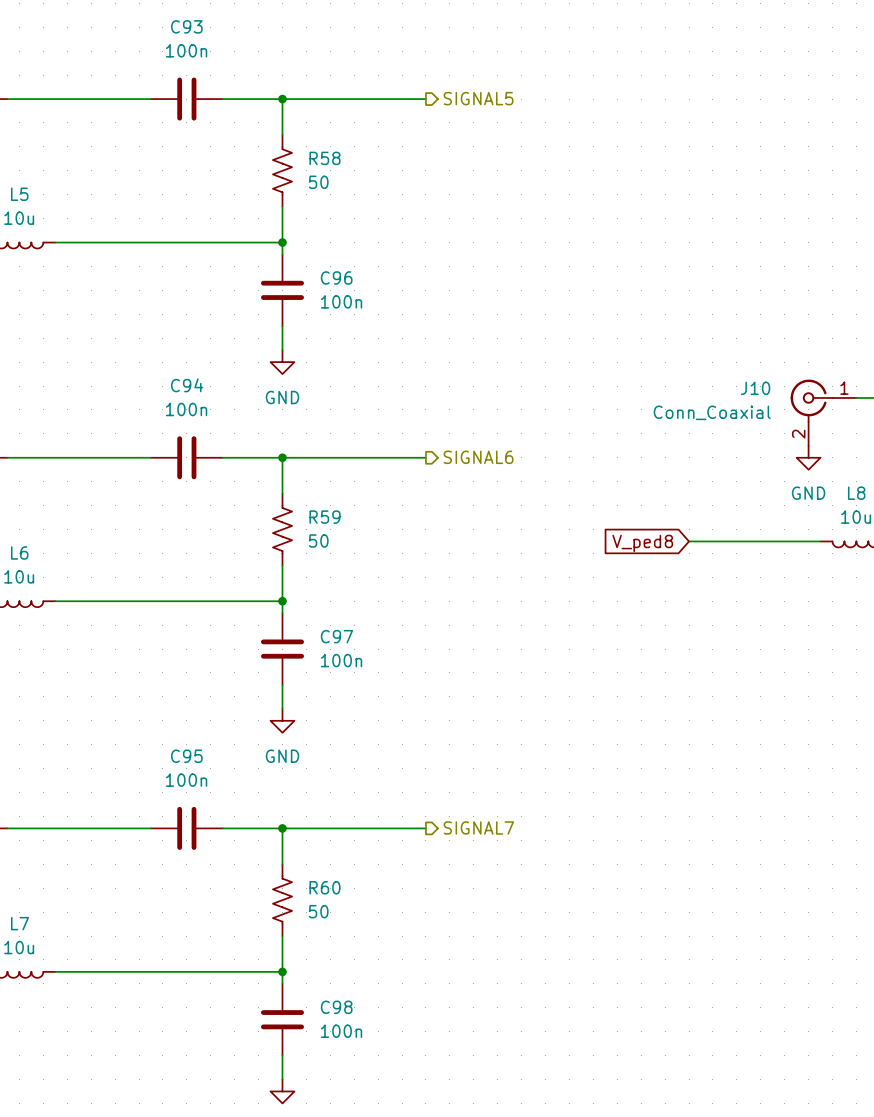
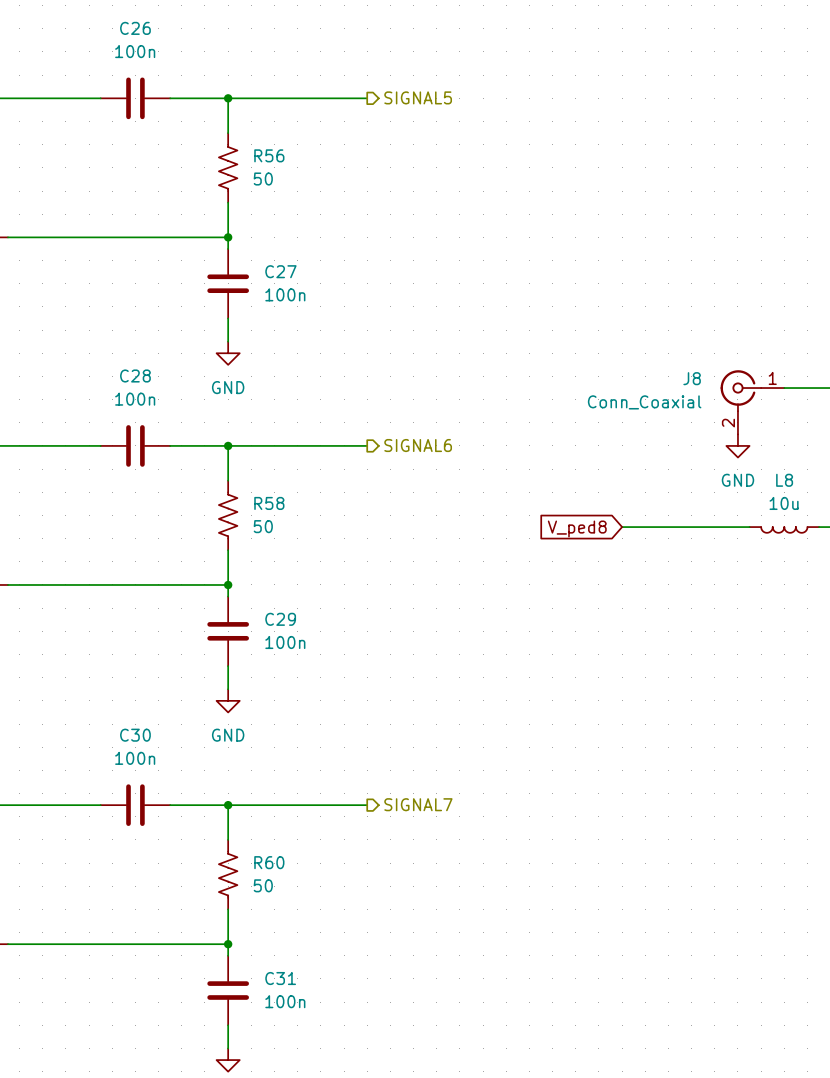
C93 name: C93 (186, 26) -> C26 (135, 28)
R58 name: R58 (324, 158) -> R56 (269, 155)
C96 name: C96 (336, 277) -> C27 (280, 271)
C94 name: C94 (187, 385) -> C28 (135, 375)
J10 name: J10 (755, 388) -> J8 (692, 378)
R59 name: R59 (324, 517) -> R58 (269, 503)
C97 name: C97 (336, 636) -> C29 (280, 619)
C95 name: C95 (186, 756) -> C30 (135, 735)
C98 name: C98 (336, 1007) -> C31 (280, 978)

